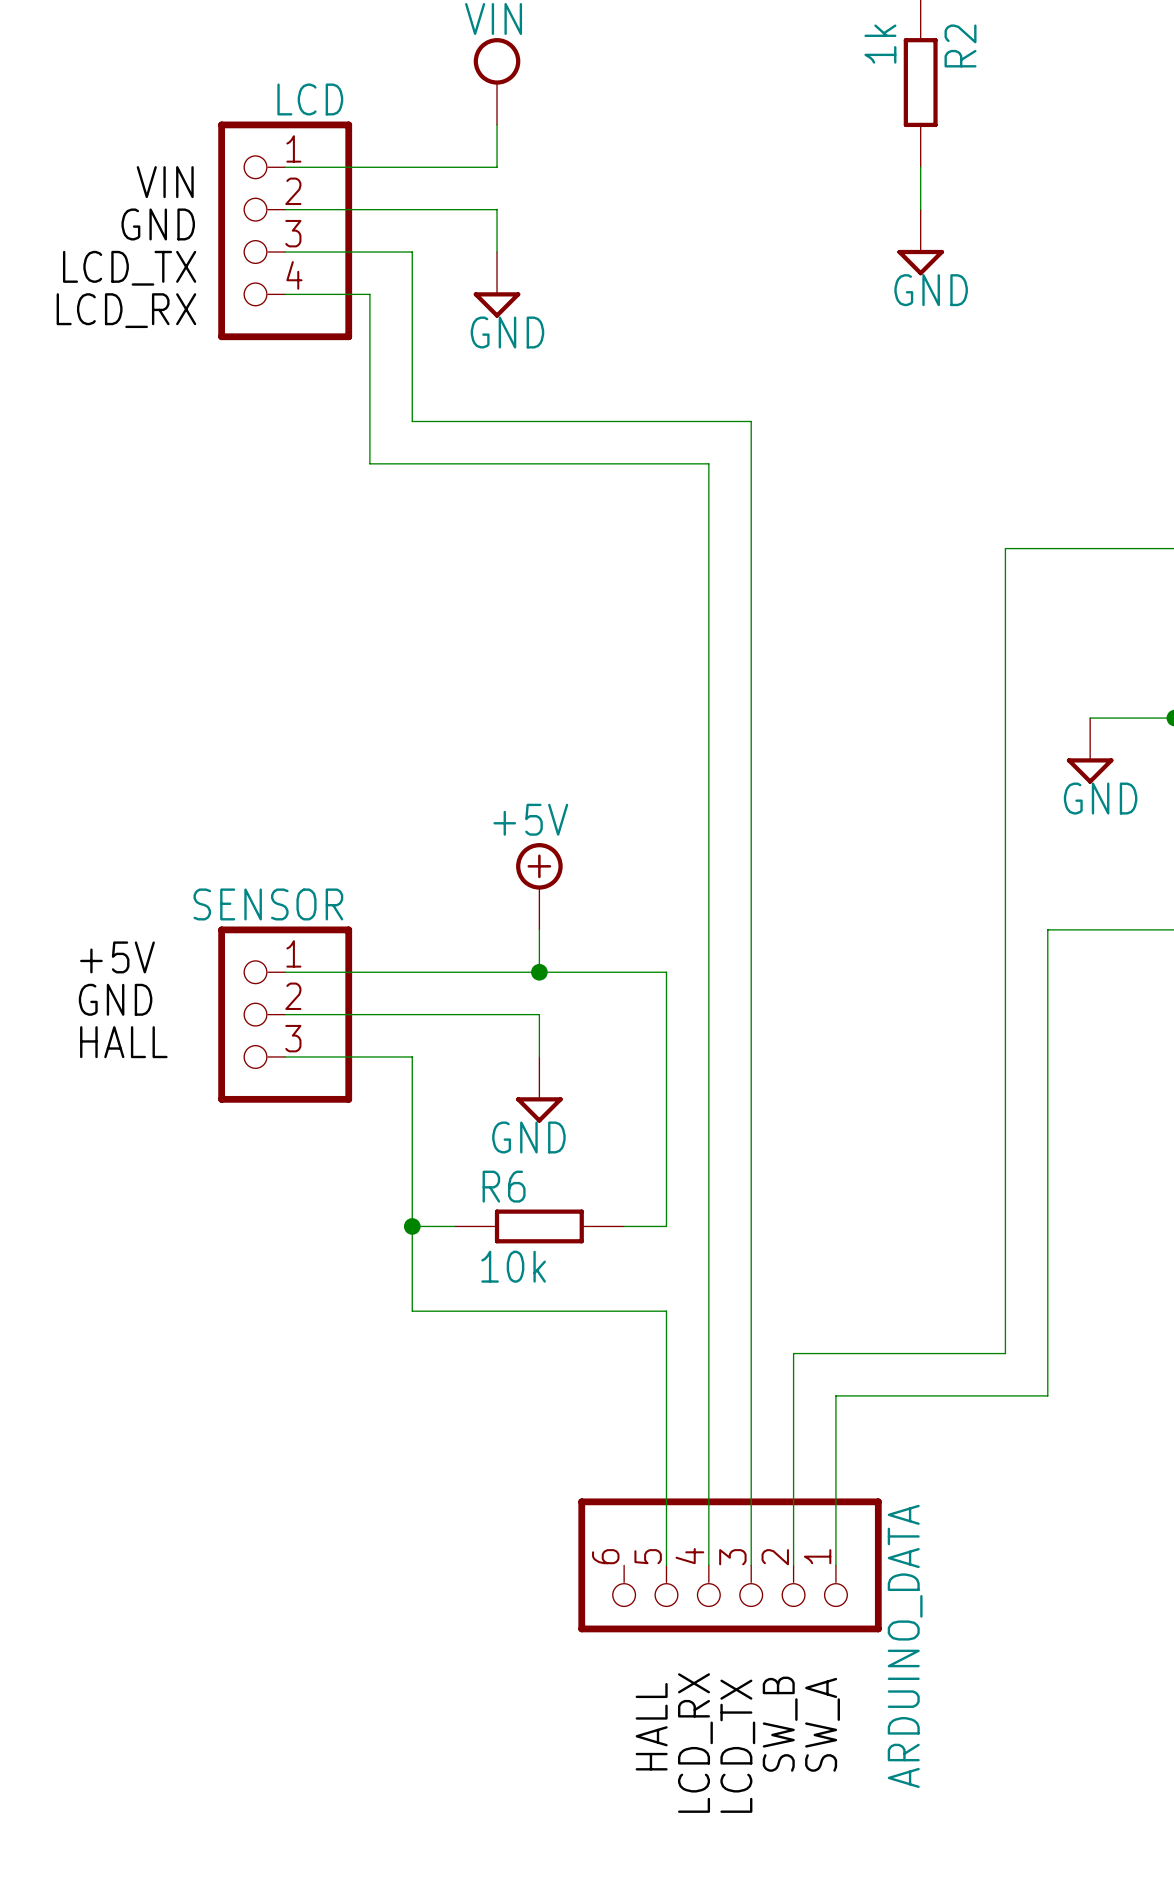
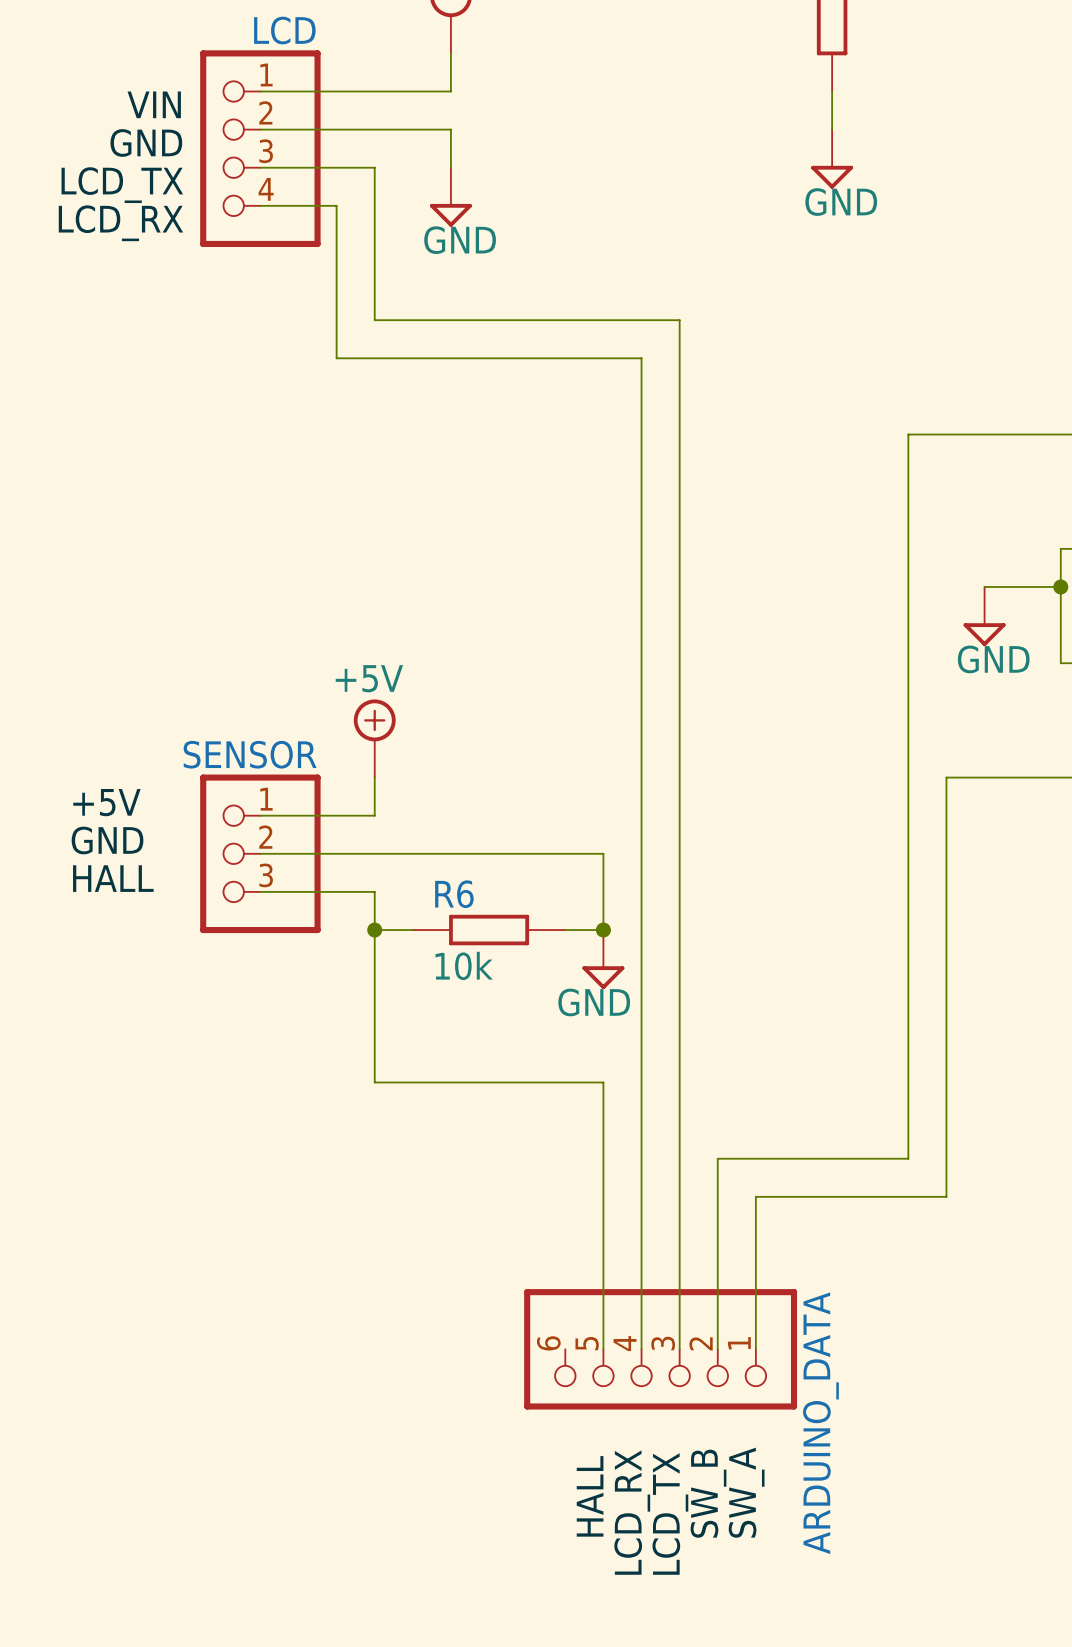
power symbol position: +5V (539, 886) -> +5V (374, 738)
wire: (539, 929) (539, 972) -> (374, 777) (374, 815)
wire: (412, 972) (666, 972) (666, 1014) -> (489, 853) (603, 853)
junction: (539, 972) -> none
wire: (539, 1014) (539, 1056) -> none
power symbol position: GND (539, 1089) -> GND (603, 959)
junction: none -> (374, 930)
wire: (666, 1099) (666, 1226) (624, 1226) -> (603, 930) (565, 930)
junction: none -> (603, 930)
wire: (412, 1226) (454, 1226) -> (374, 930) (412, 930)
junction: (412, 1226) -> none
R6 position: (539, 1226) -> (489, 930)
wire: (412, 1268) (412, 1311) (666, 1311) -> (374, 1082) (603, 1082) (603, 1120)

